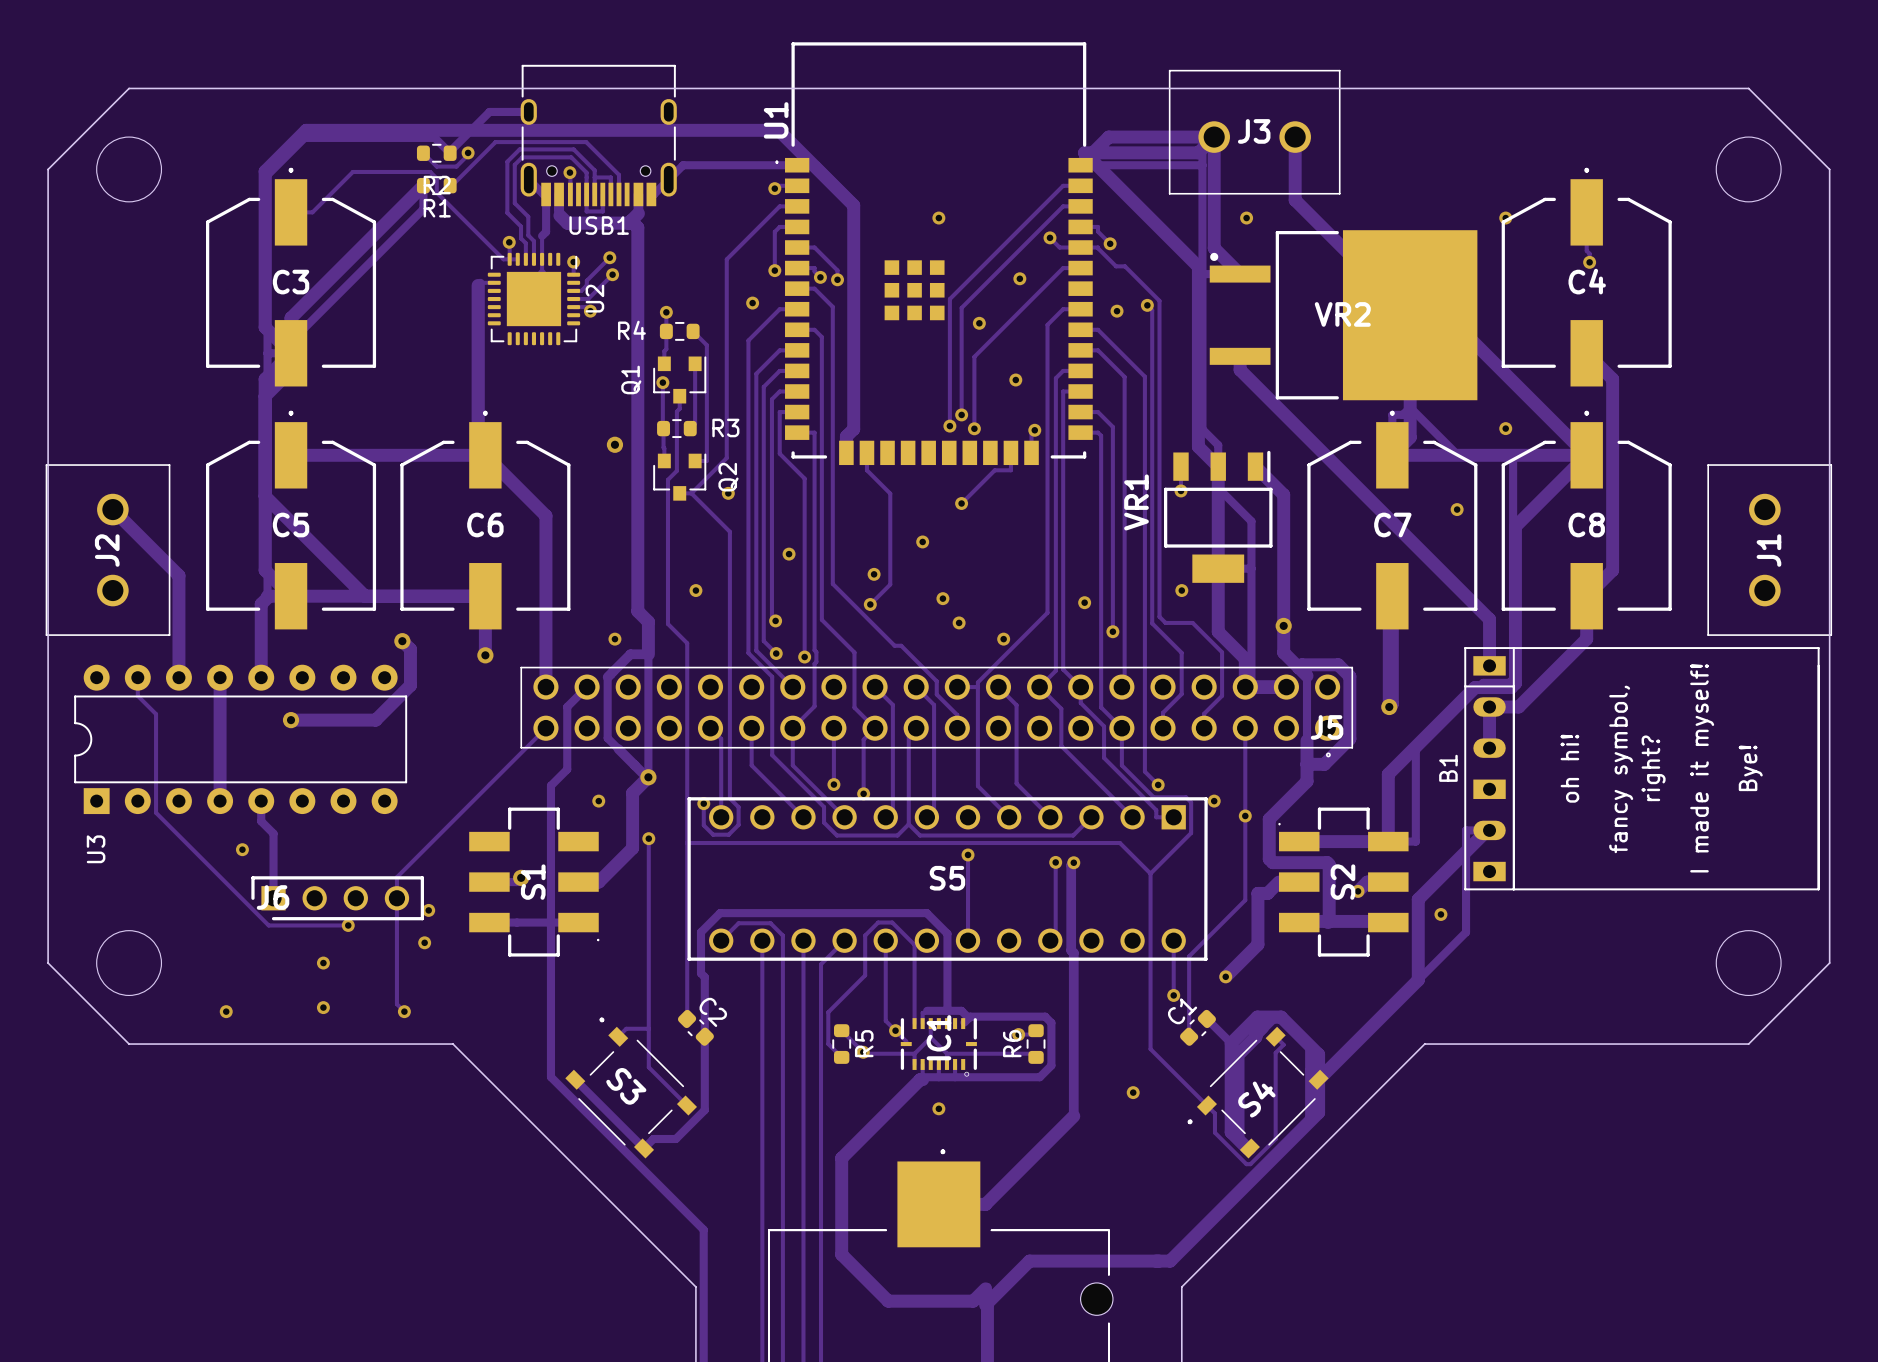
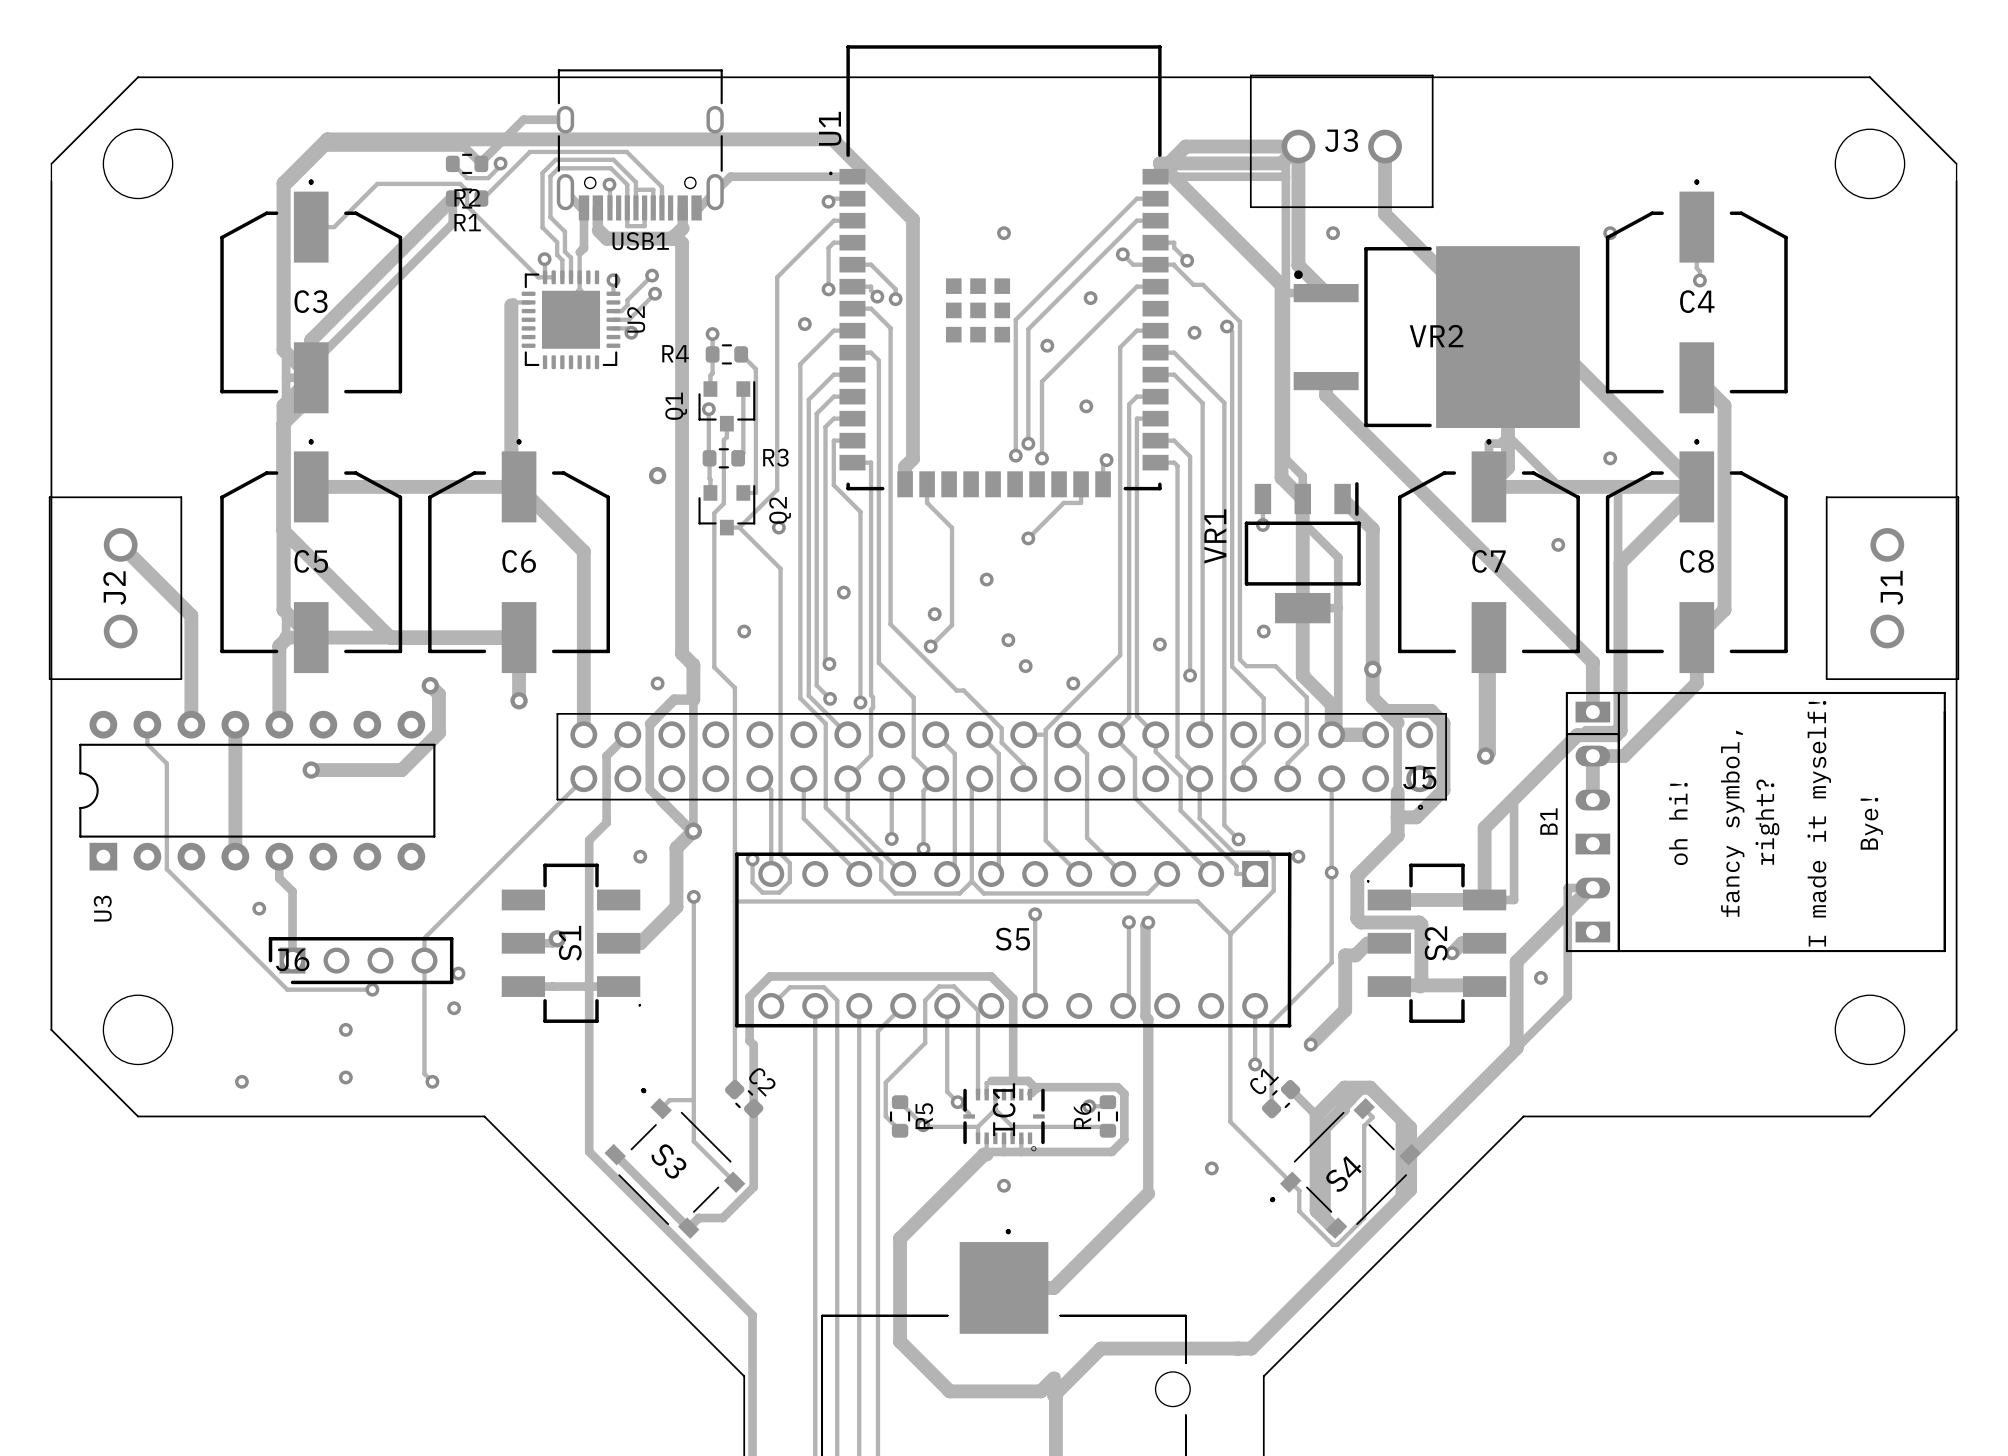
board edge: (48, 169) (129, 88) (1748, 88) (1829, 169) -> (51, 181) (51, 163) (138, 77) (1869, 77) (1956, 163) (1956, 181)
round board edge position: (129, 169) -> (138, 163)
round board edge position: (1748, 169) -> (1869, 163)

